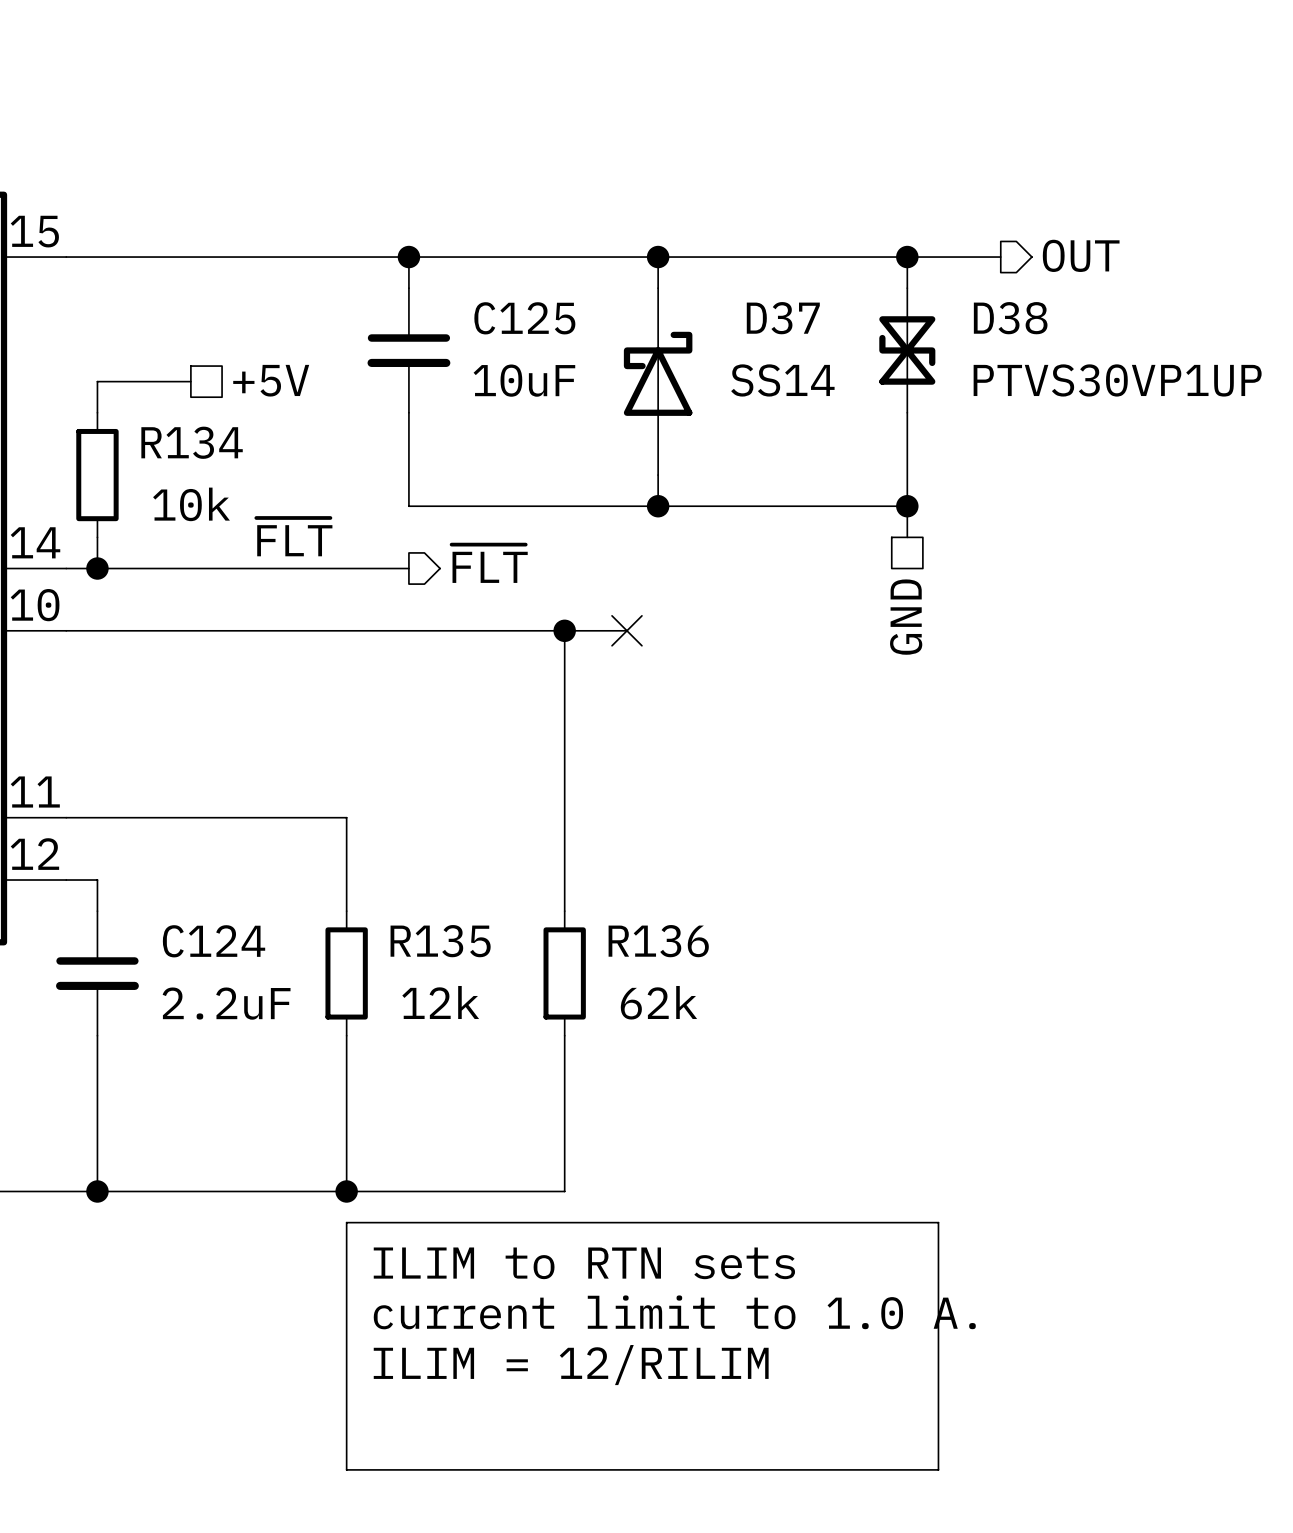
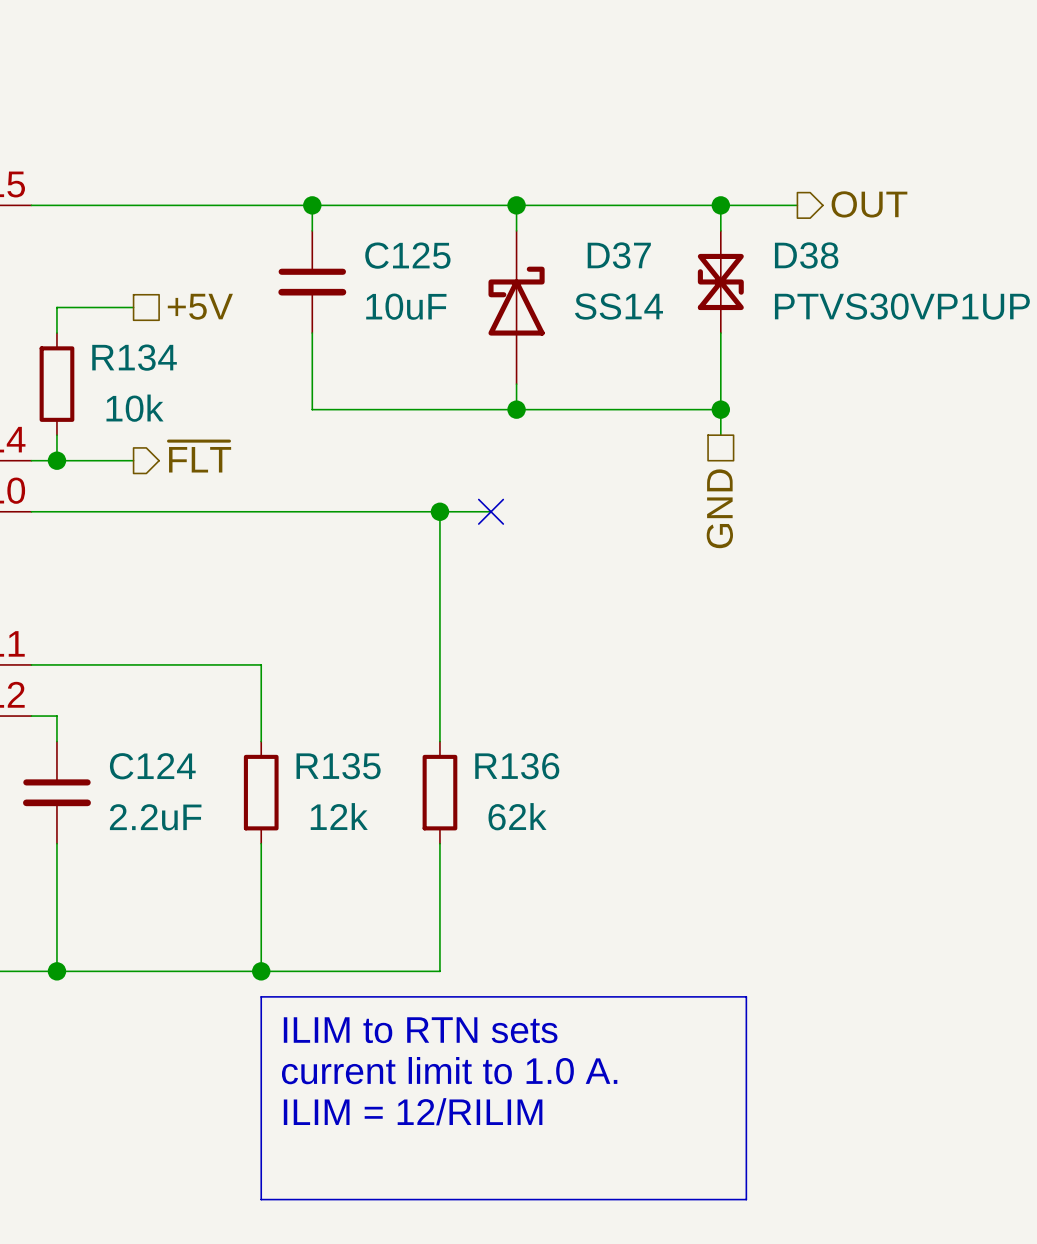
label: ~{FLT} (294, 537) -> none
hierarchical label position: ~{FLT} (489, 563) -> ~{FLT} (199, 456)
wire: (190, 568) (408, 568) -> none

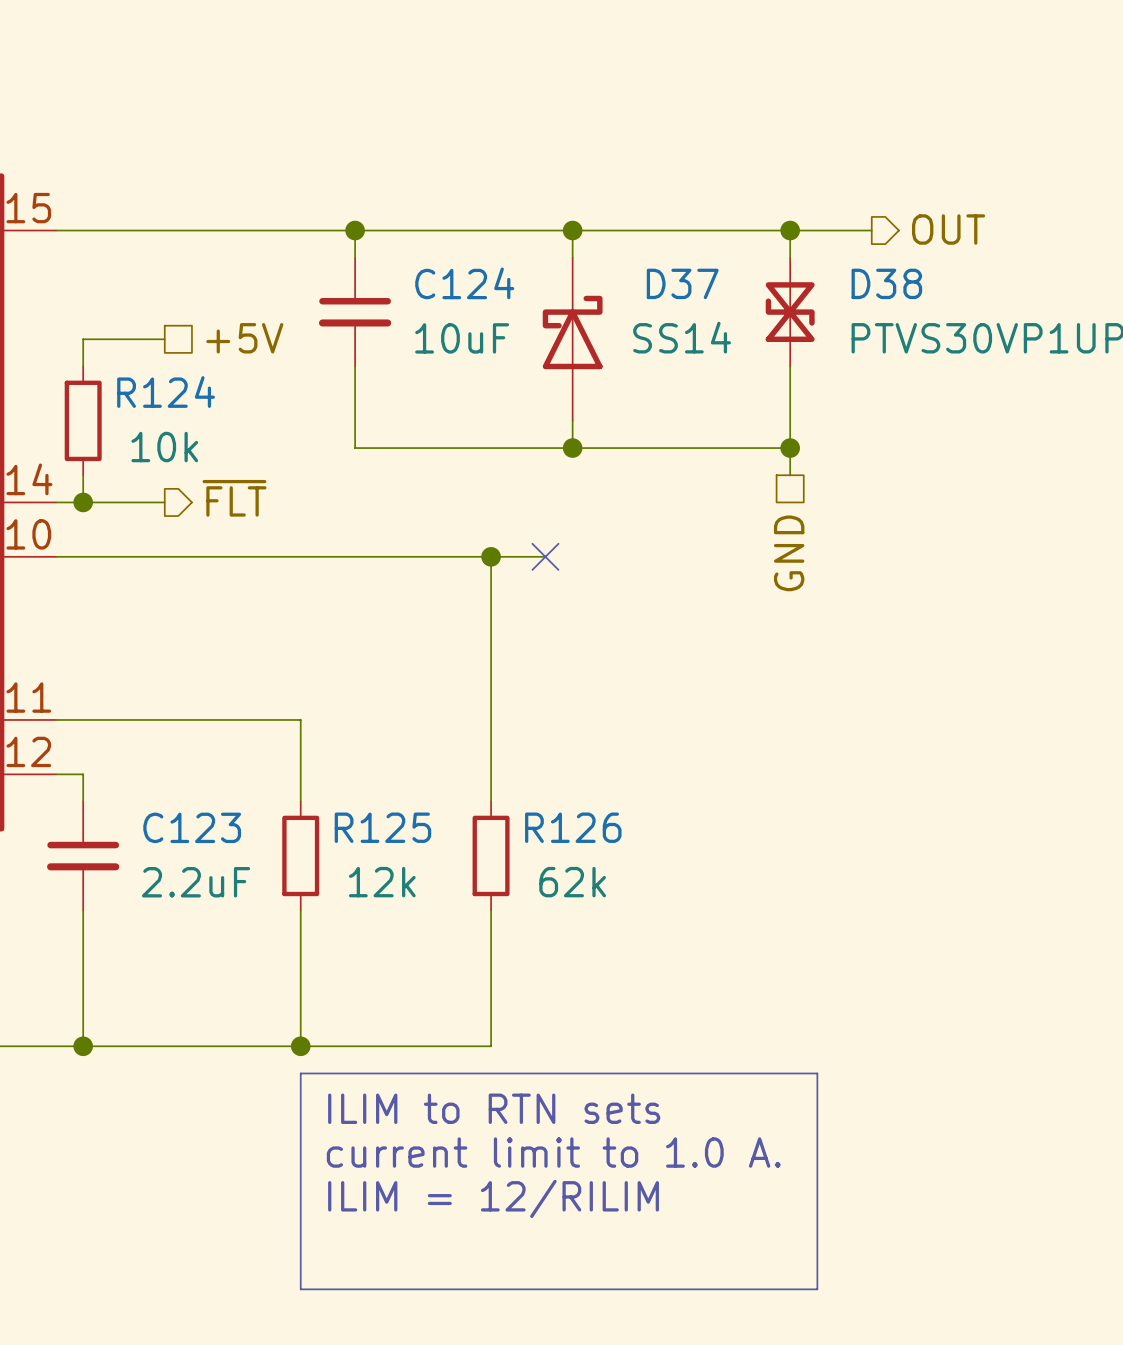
C125 name: C125 (407, 255) -> C124 (464, 283)
R134 name: R134 (134, 357) -> R124 (166, 392)
C124 name: C124 (152, 766) -> C123 (192, 827)
R135 name: R135 (338, 766) -> R125 (382, 827)
R136 name: R136 (517, 766) -> R126 (573, 827)

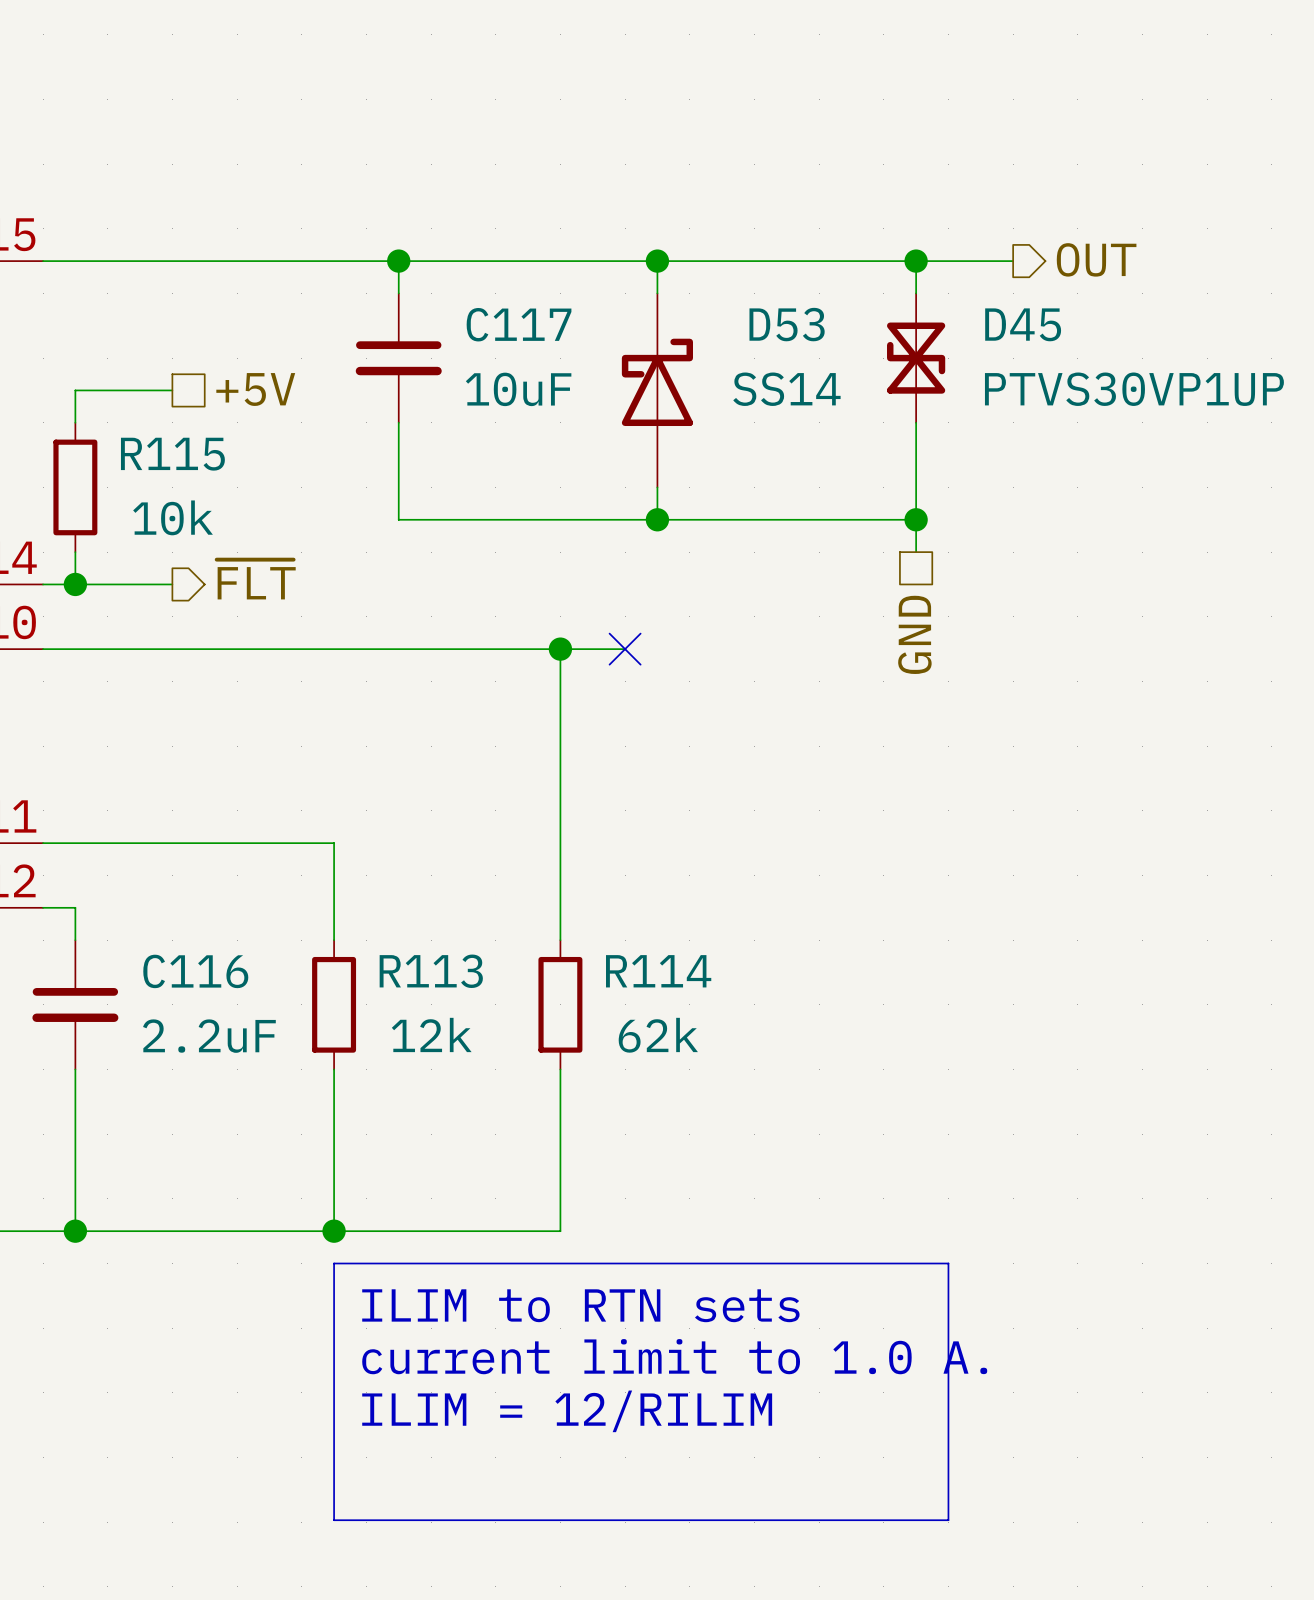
C124 name: C124 (464, 283) -> C117 (519, 324)
D37 name: D37 (682, 283) -> D53 (787, 324)
D38 name: D38 (886, 283) -> D45 (1023, 324)
R124 name: R124 (166, 392) -> R115 (172, 454)
C123 name: C123 (192, 827) -> C116 (195, 971)
R125 name: R125 (382, 827) -> R113 (431, 971)
R126 name: R126 (573, 827) -> R114 (658, 971)

